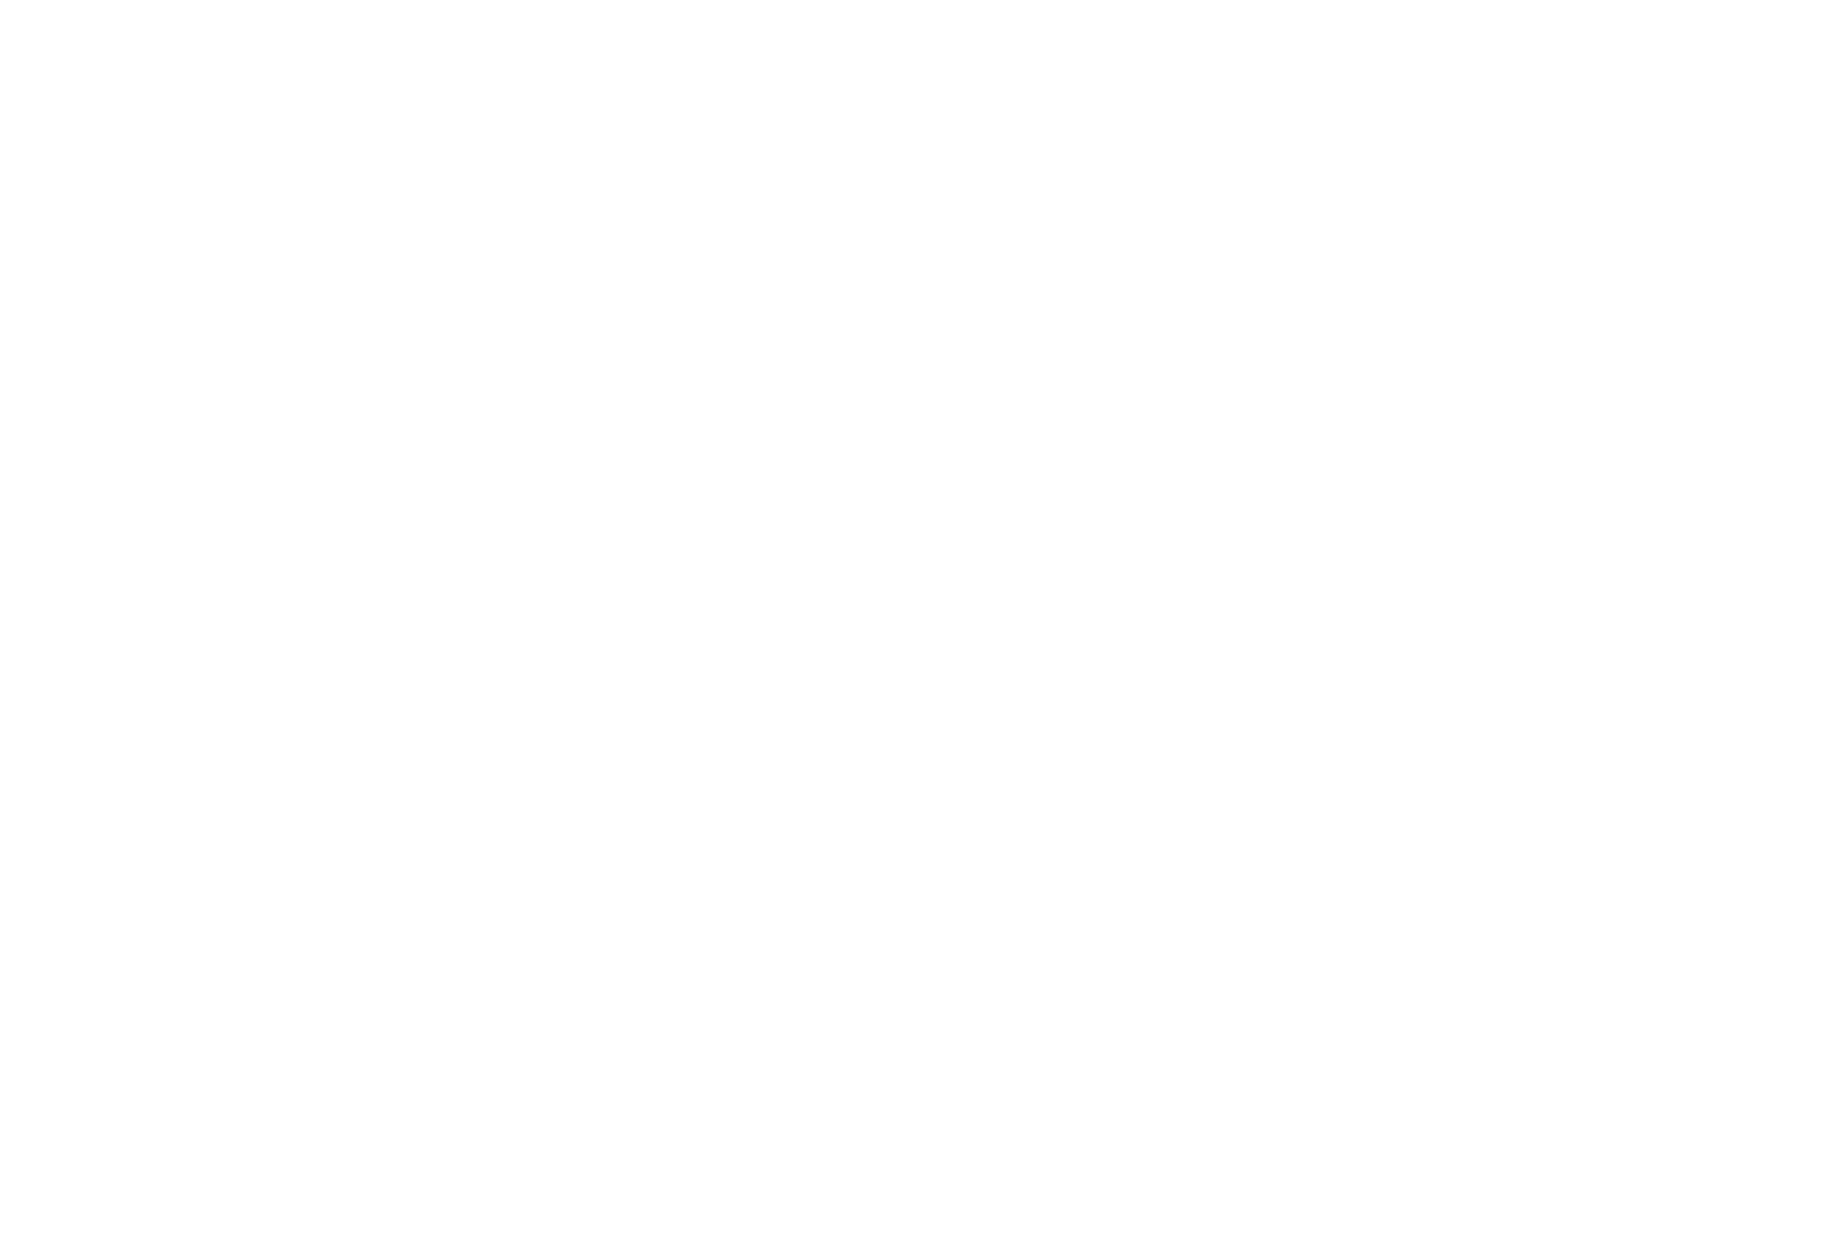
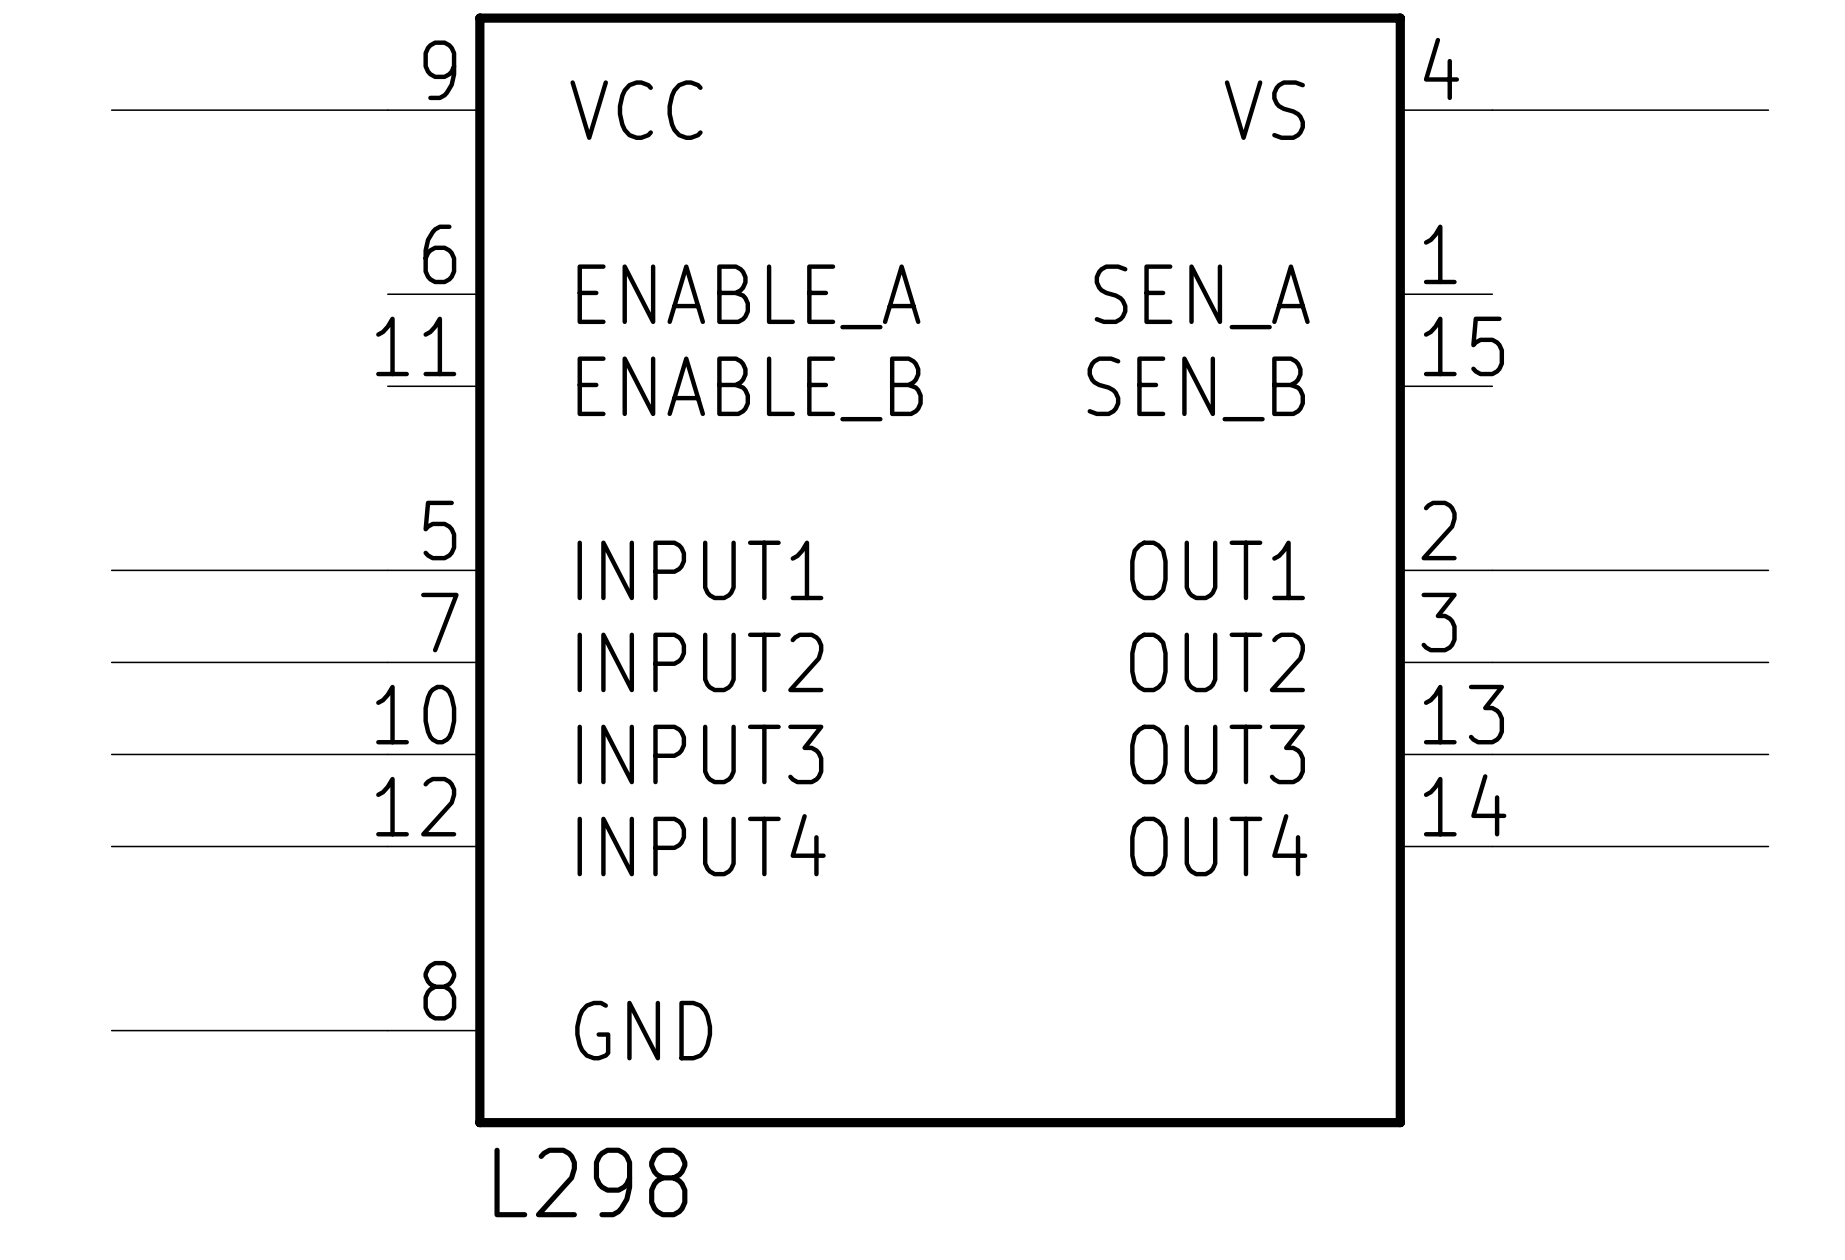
wire: none -> (111, 110) (387, 110)
wire: none -> (1492, 110) (1768, 110)
wire: none -> (111, 570) (387, 570)
part: none -> L298 (940, 570)
wire: none -> (1492, 570) (1768, 570)
wire: none -> (111, 662) (387, 662)
wire: none -> (1492, 662) (1768, 662)
wire: none -> (111, 754) (387, 754)
wire: none -> (1492, 754) (1768, 754)
wire: none -> (111, 846) (387, 846)
wire: none -> (1492, 846) (1768, 846)
wire: none -> (111, 1030) (387, 1030)

